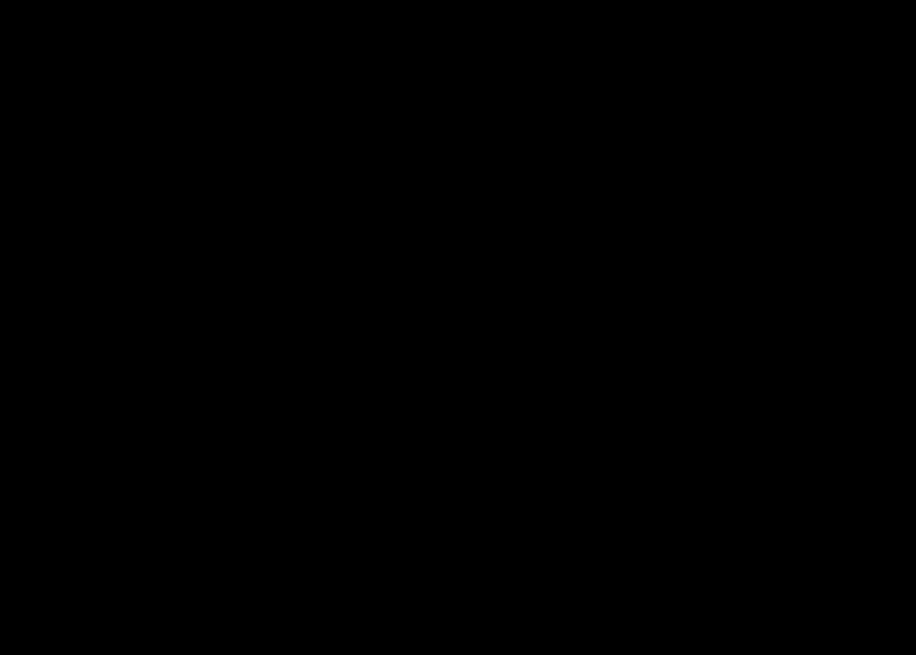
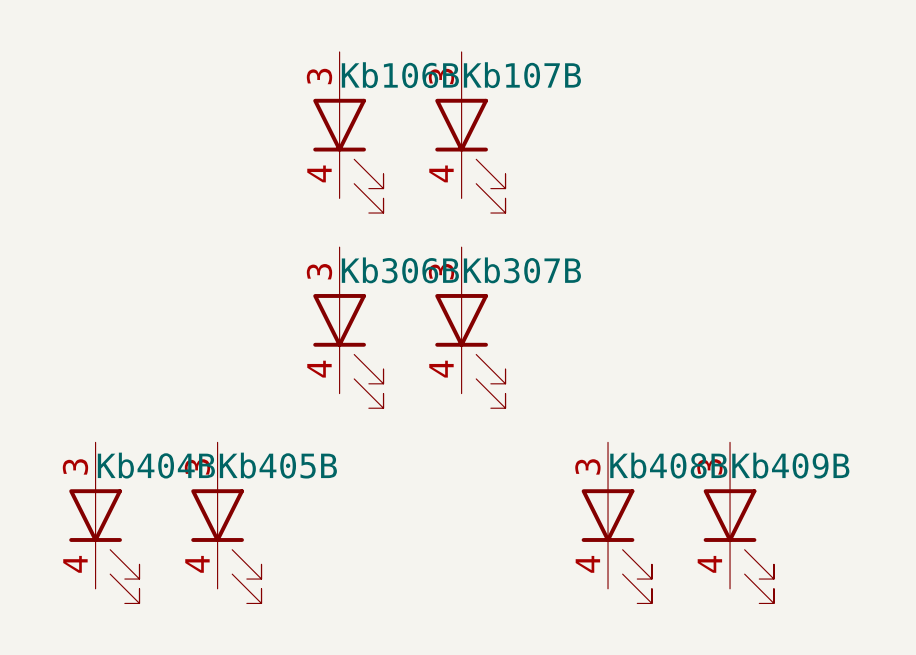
Kb106B: none -> (348, 132)
Kb107B: none -> (470, 132)
Kb306B: none -> (348, 327)
Kb307B: none -> (470, 327)
Kb404B: none -> (104, 522)
Kb405B: none -> (226, 522)
Kb408B: none -> (616, 522)
Kb409B: none -> (738, 522)

